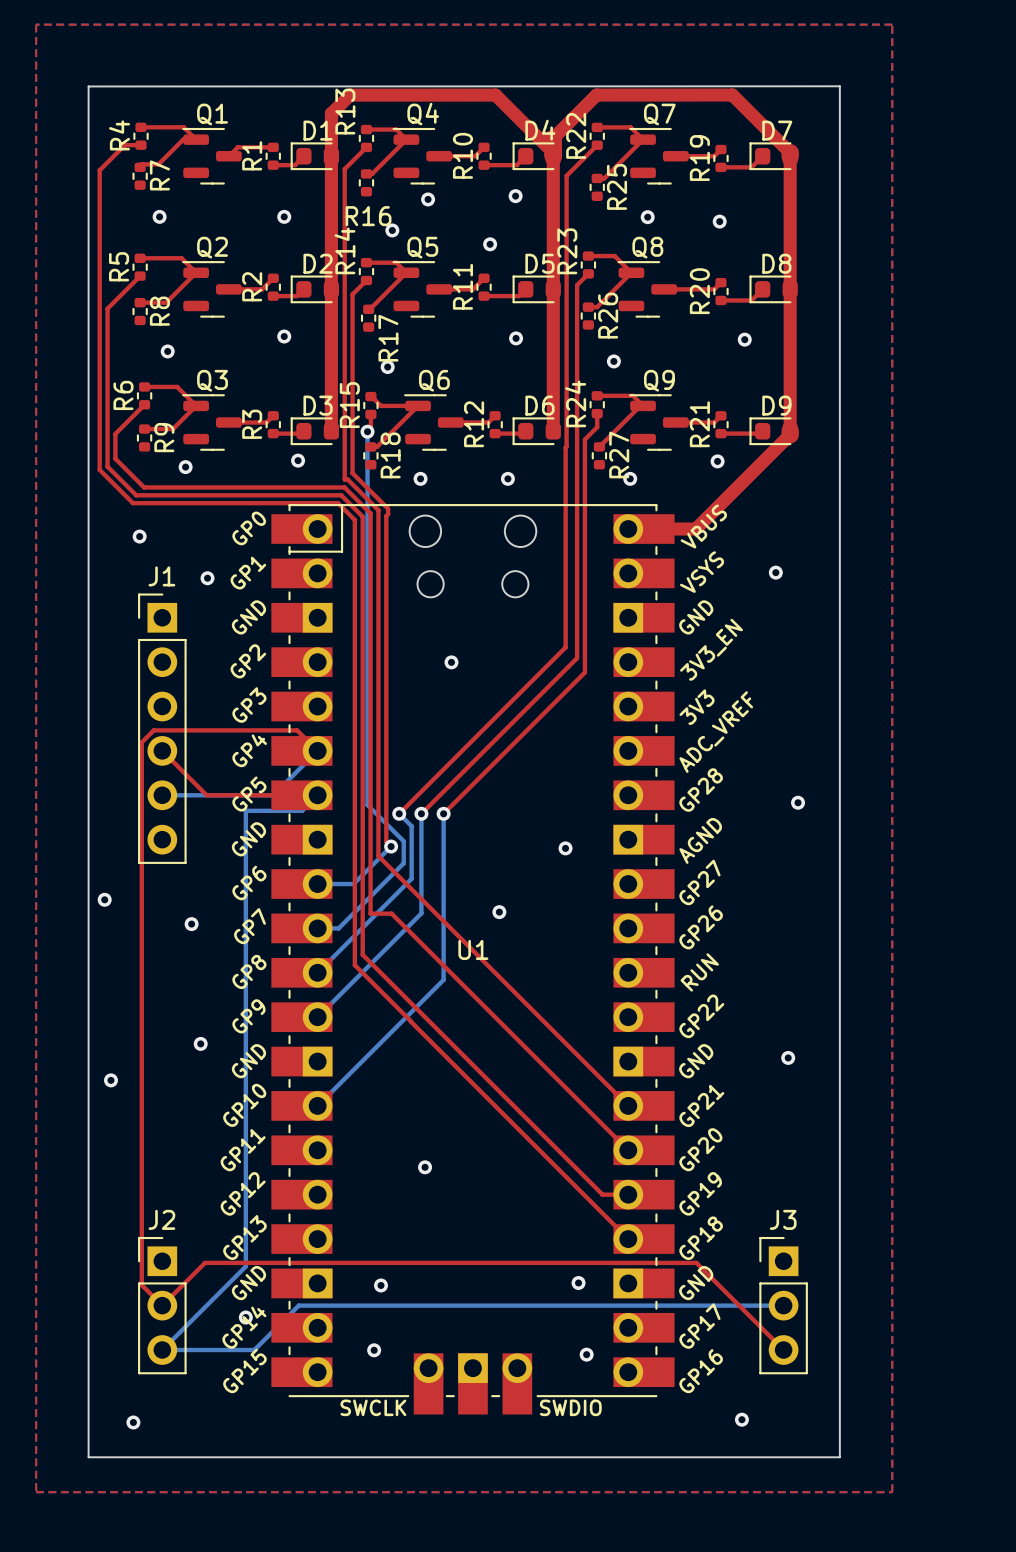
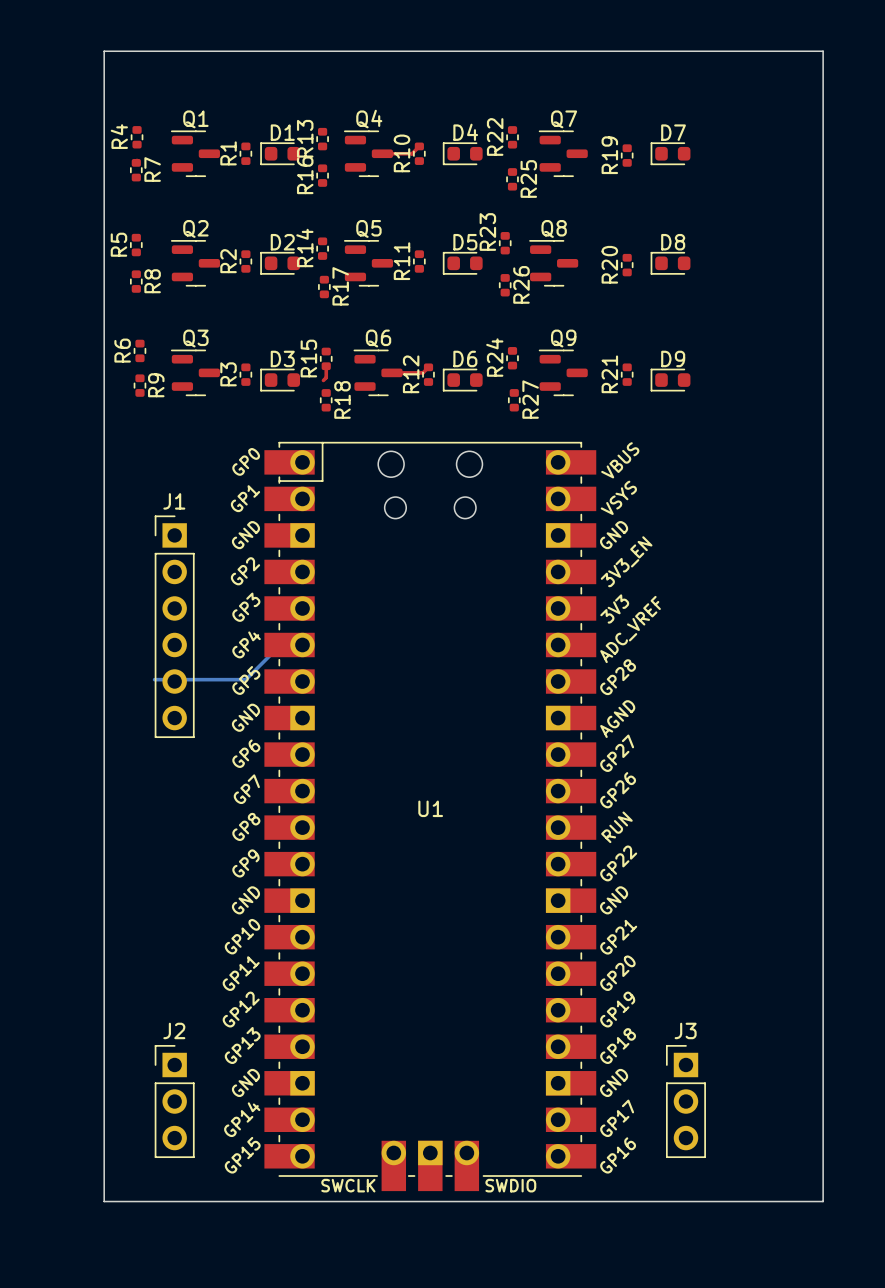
top zone outline: (36, 24) (36, 1492) (892, 1492) (892, 24) (36, 24) -> none
board edge: (839, 86) (839, 1457) (88, 1457) (88, 86) (839, 86) -> (104, 51) (104, 1201) (823, 1201) (823, 51) (104, 51)
R13 name position: R13 (345, 111) -> R13 (305, 138)
top track: (141, 127) (183, 127) (196, 139) (183, 139) (158, 164) (143, 164) (140, 167) -> none
top track: (597, 127) (630, 127) (643, 139) (604, 178) (597, 178) -> none
top track: (366, 129) (396, 129) (406, 139) (372, 173) (366, 173) -> none
top track: (141, 145) (124, 145) (99, 170) (99, 469) (132, 503) (338, 503) (354, 520) (354, 965) (628, 1239) -> none
top track: (597, 145) (566, 175) (565, 647) (399, 813) -> none
top track: (273, 147) (237, 147) (228, 156) -> none
top track: (366, 147) (344, 169) (344, 479) (347, 479) (378, 510) (378, 856) (628, 1105) -> none
top track: (720, 149) (714, 156) (675, 156) -> none
top track: (553, 152) (495, 95) (350, 95) (331, 113) (331, 431) -> none
top track: (303, 156) (294, 165) (273, 165) -> none
top track: (525, 156) (516, 165) (484, 165) -> none
top track: (762, 156) (751, 167) (720, 167) -> none
D7 position: (773, 156) -> (670, 153)
R19 position: (720, 158) -> (627, 155)
via: (515, 196) -> none
via: (428, 199) -> none
via: (159, 216) -> none
via: (284, 216) -> none
R16 name rotation: 0° (368, 216) -> 90° counterclockwise (305, 175)
via: (647, 217) -> none
via: (719, 221) -> none
via: (392, 230) -> none
via: (490, 244) -> none
R14 name position: R14 (344, 250) -> R14 (304, 247)
top track: (588, 256) (614, 256) (631, 272) (597, 307) (588, 307) -> none
top track: (140, 258) (181, 258) (196, 272) (166, 302) (140, 302) -> none
top track: (366, 262) (396, 262) (406, 272) (369, 309) -> none
top track: (588, 273) (577, 285) (577, 658) (421, 813) -> none
top track: (140, 276) (107, 308) (107, 466) (136, 495) (341, 495) (362, 516) (362, 954) (602, 1194) (628, 1194) -> none
top track: (273, 278) (262, 289) (228, 289) -> none
top track: (484, 278) (472, 289) (439, 289) -> none
top track: (366, 280) (352, 294) (352, 473) (388, 508) (386, 516) (386, 841) (391, 846) -> none
top track: (720, 282) (714, 289) (664, 289) -> none
top track: (303, 289) (297, 296) (273, 296) -> none
top track: (525, 289) (519, 296) (484, 296) -> none
top track: (762, 289) (751, 300) (720, 300) -> none
D8 position: (773, 289) -> (670, 263)
R20 position: (720, 291) -> (627, 265)
via: (284, 336) -> none
R17 name position: R17 (388, 338) -> R17 (340, 286)
via: (516, 338) -> none
via: (744, 339) -> none
via: (167, 351) -> none
via: (613, 361) -> none
via: (387, 367) -> none
top track: (144, 386) (177, 386) (196, 405) (172, 429) (144, 429) -> none
top track: (370, 395) (380, 405) (418, 405) (377, 446) (370, 446) -> none
top track: (597, 395) (632, 395) (643, 405) (640, 405) (599, 446) -> none
top track: (144, 404) (115, 433) (115, 458) (144, 487) (344, 487) (370, 513) (370, 913) (391, 913) (628, 1150) -> none
top track: (597, 413) (597, 427) (584, 439) (584, 672) (443, 813) -> none
top track: (273, 415) (266, 422) (228, 422) -> none
top track: (720, 415) (714, 422) (675, 422) -> none
R21 position: (720, 424) -> (627, 374)
bottom track: (367, 431) (367, 805) (403, 841) (403, 863) (338, 928) (317, 928) -> none
via: (367, 431) -> none
top track: (553, 431) (553, 138) (596, 95) (732, 95) (790, 152) (790, 434) (695, 529) (628, 529) -> none
D9 position: (773, 431) -> (670, 380)
top track: (273, 433) (301, 433) -> none
top track: (495, 433) (523, 433) -> none
top track: (720, 433) (760, 433) -> none
via: (298, 460) -> none
via: (717, 461) -> none
via: (185, 467) -> none
via: (420, 478) -> none
via: (507, 478) -> none
via: (630, 478) -> none
via: (139, 536) -> none
via: (775, 572) -> none
via: (207, 578) -> none
via: (451, 662) -> none
J1 position: (162, 728) -> (174, 626)
top track: (162, 750) (206, 795) (317, 795) -> none
top track: (317, 750) (297, 730) (153, 730) (141, 742) (141, 1285) (162, 1305) (205, 1262) (696, 1262) (783, 1350) -> none
bottom track: (317, 795) (302, 810) (245, 810) (245, 1266) (162, 1350) (254, 1350) (298, 1305) (783, 1305) -> none
via: (798, 802) -> none
bottom track: (399, 813) (411, 826) (411, 878) (317, 972) -> none
via: (399, 813) -> none
bottom track: (421, 813) (421, 913) (317, 1017) -> none
via: (421, 813) -> none
bottom track: (443, 813) (443, 979) (317, 1105) -> none
via: (443, 813) -> none
bottom track: (391, 846) (353, 884) (317, 884) -> none
via: (391, 846) -> none
via: (565, 848) -> none
via: (104, 899) -> none
via: (499, 912) -> none
via: (191, 924) -> none
U1 position: (472, 959) -> (430, 816)
via: (200, 1043) -> none
via: (788, 1057) -> none
via: (110, 1080) -> none
via: (425, 1167) -> none
via: (578, 1282) -> none
via: (381, 1285) -> none
J2 position: (162, 1305) -> (174, 1101)
J3 position: (783, 1305) -> (685, 1101)
via: (245, 1317) -> none
via: (374, 1350) -> none
via: (586, 1354) -> none
via: (741, 1419) -> none
via: (133, 1422) -> none

